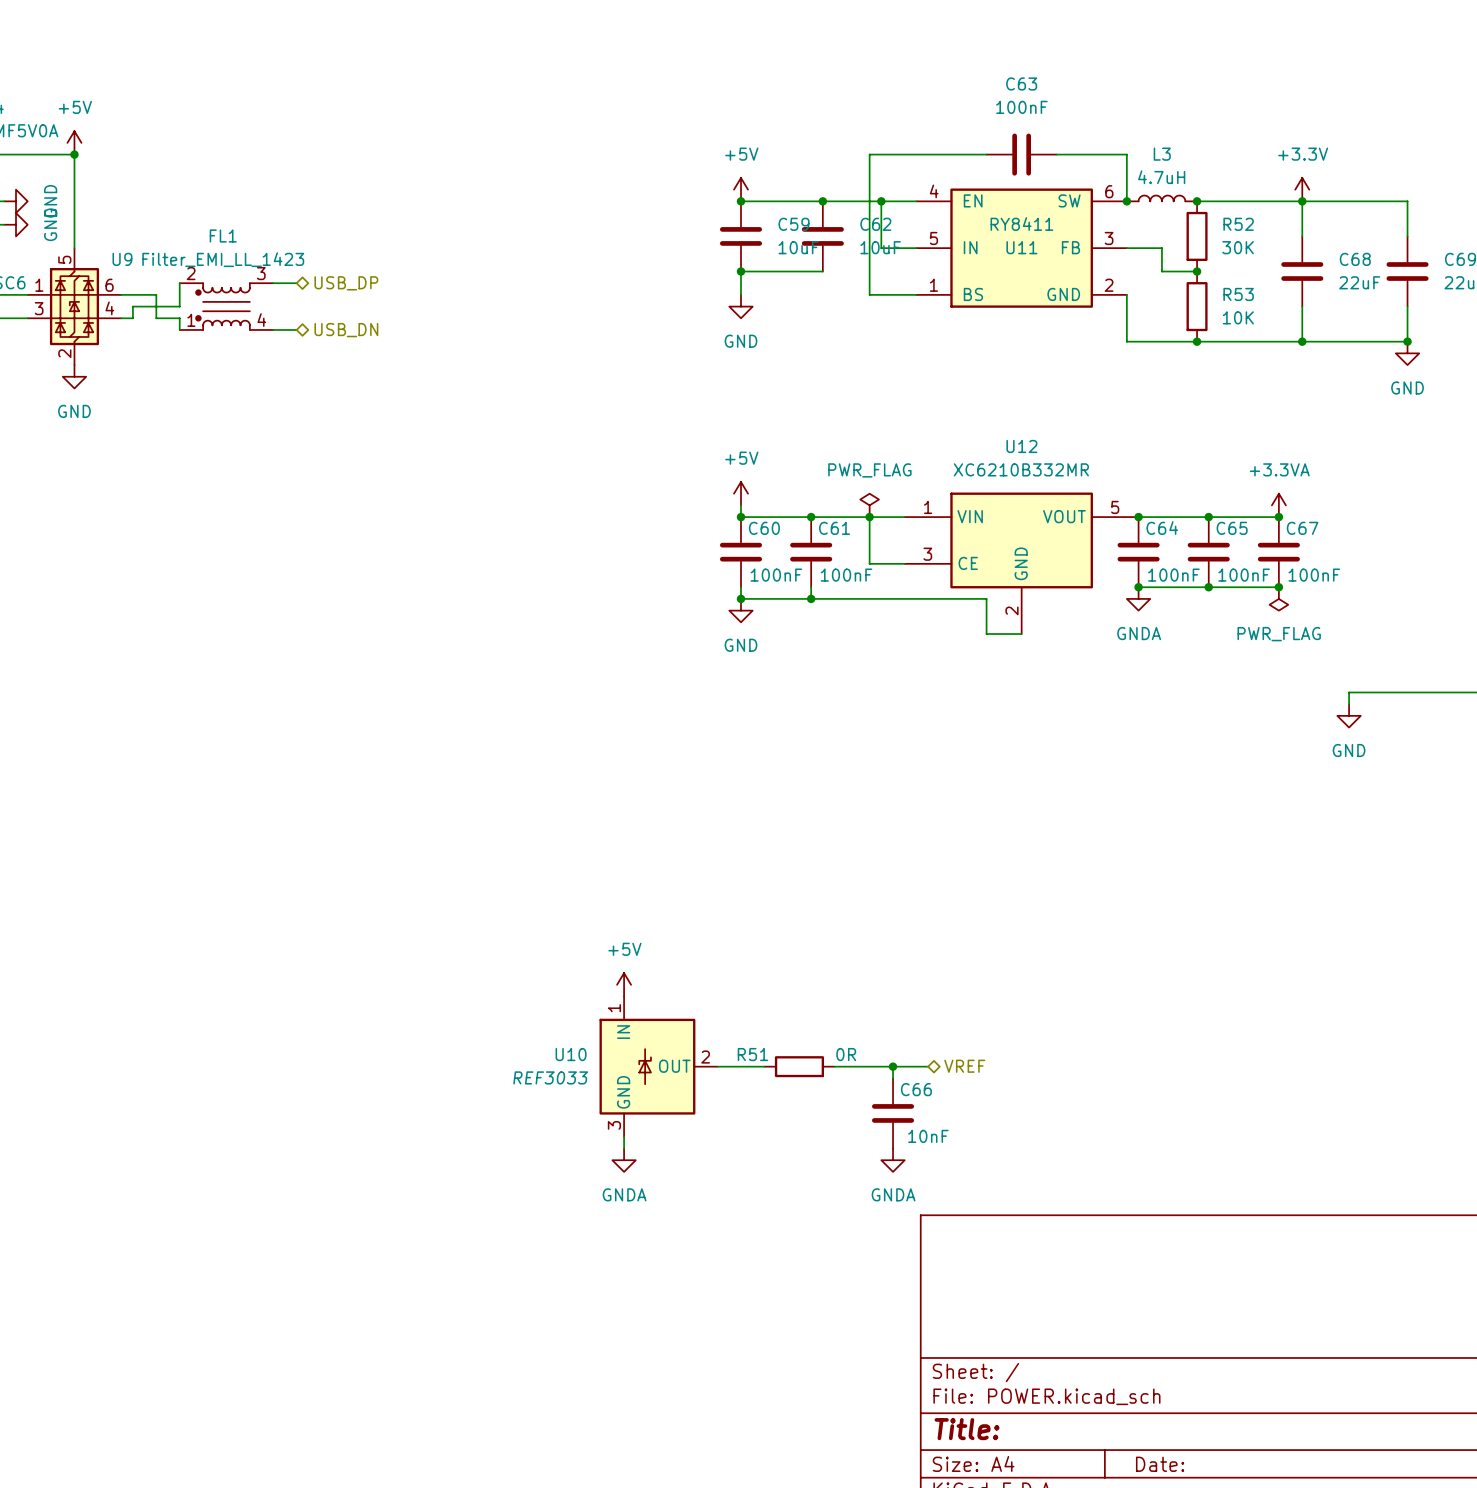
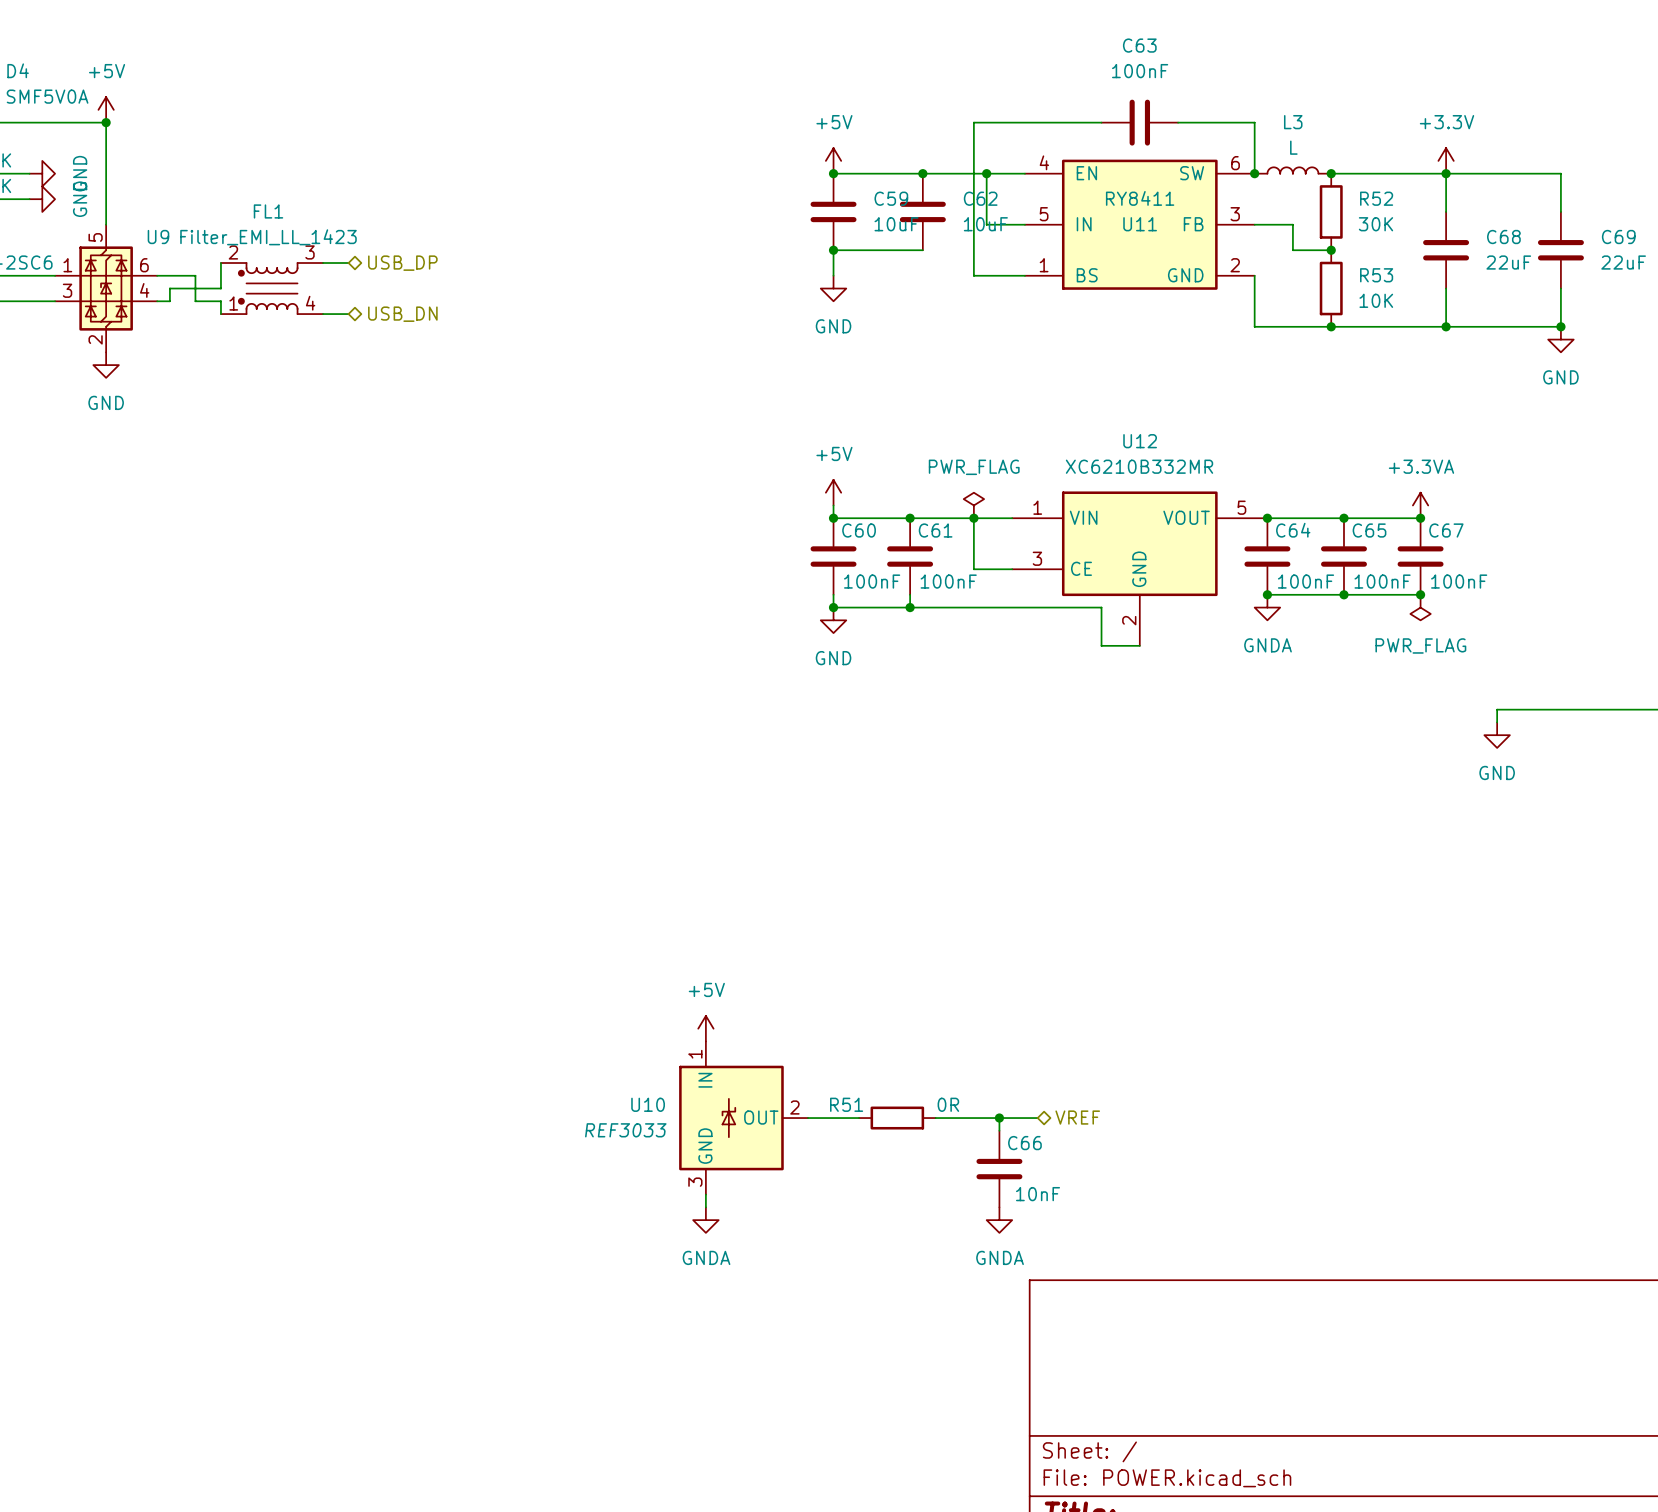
L3 value: 4.7uH (1161, 177) -> L (1293, 147)

